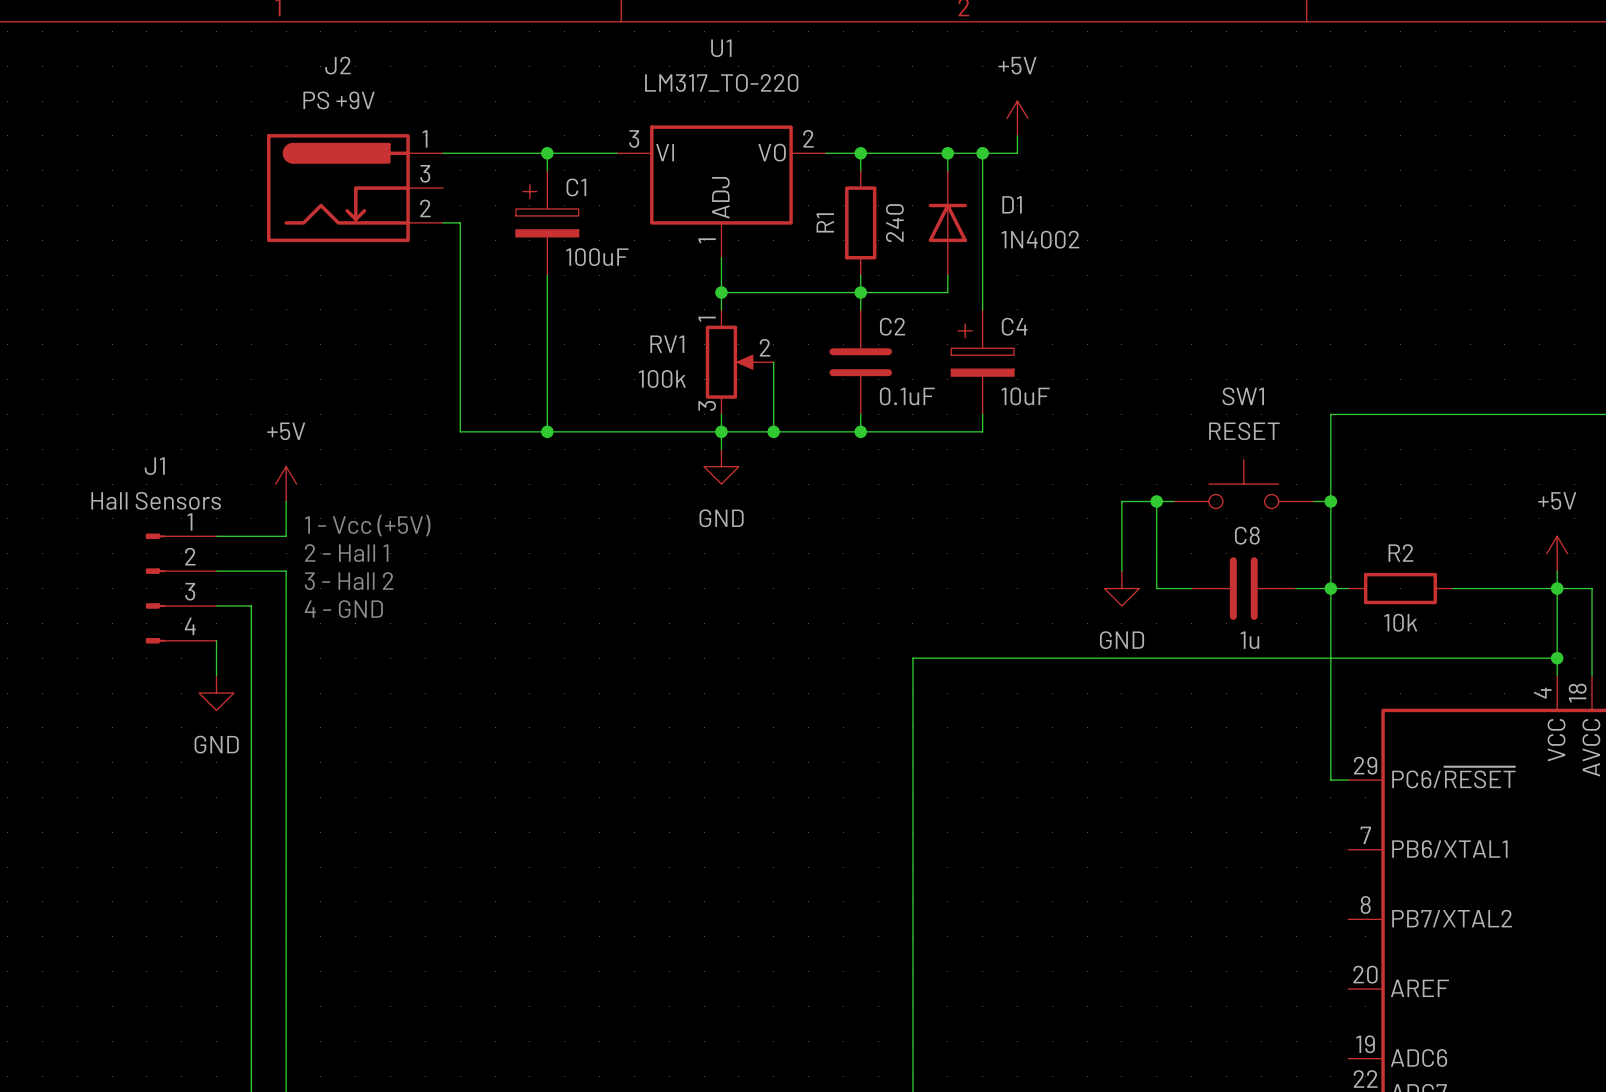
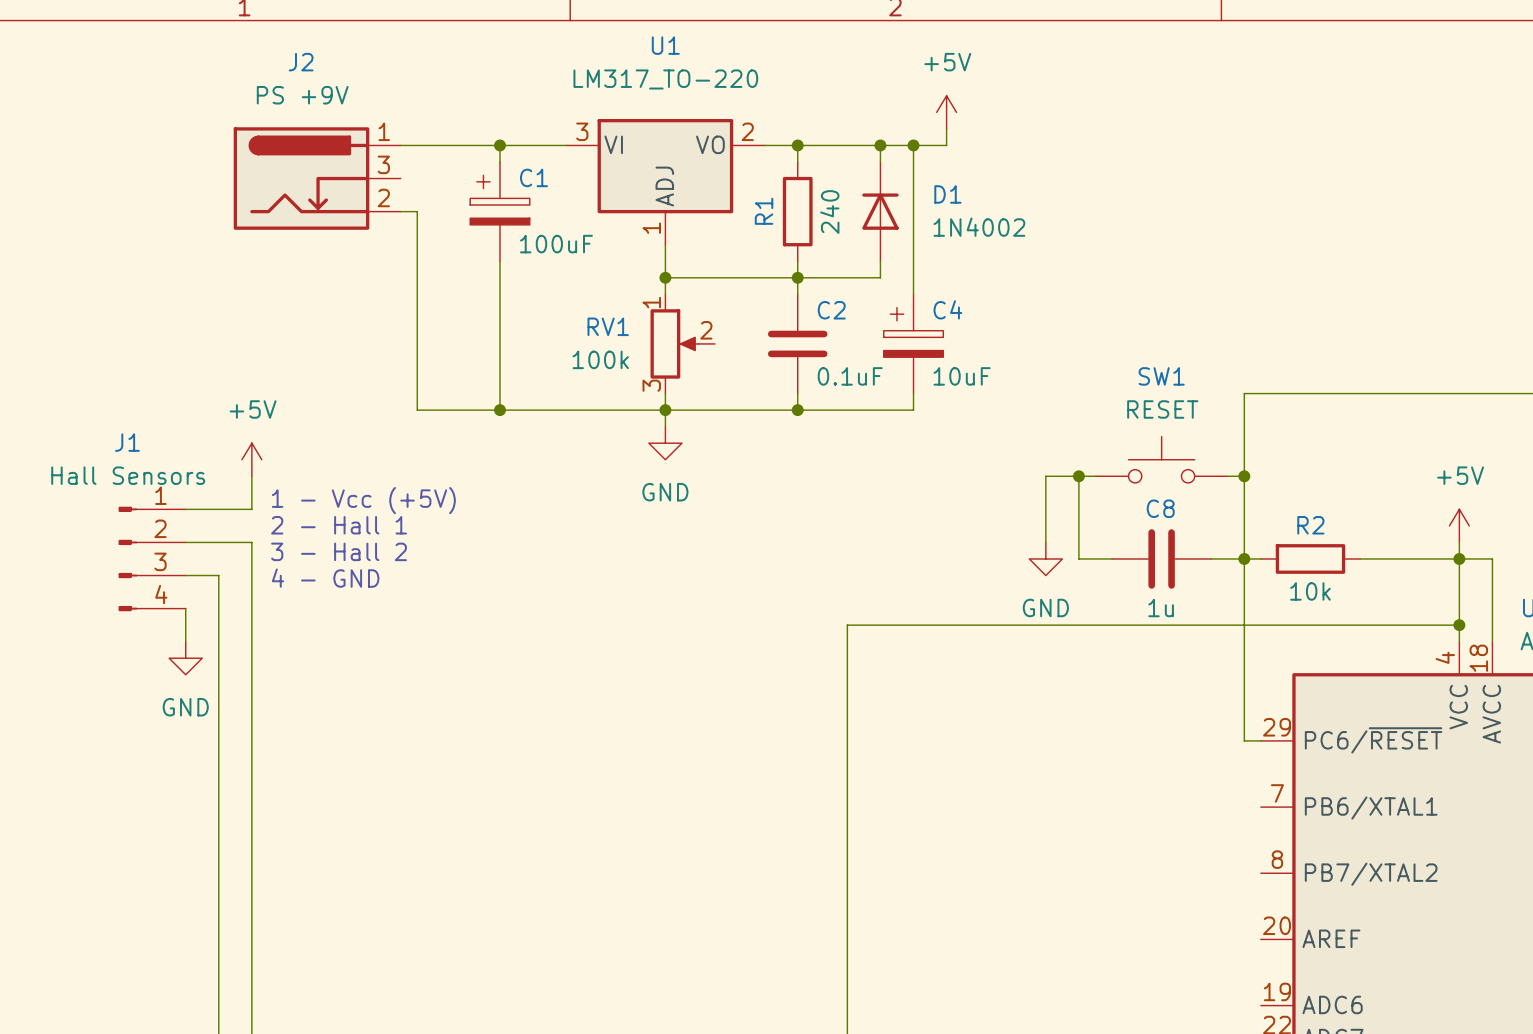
wire: (773, 362) (773, 431) -> none
junction: (773, 431) -> none

